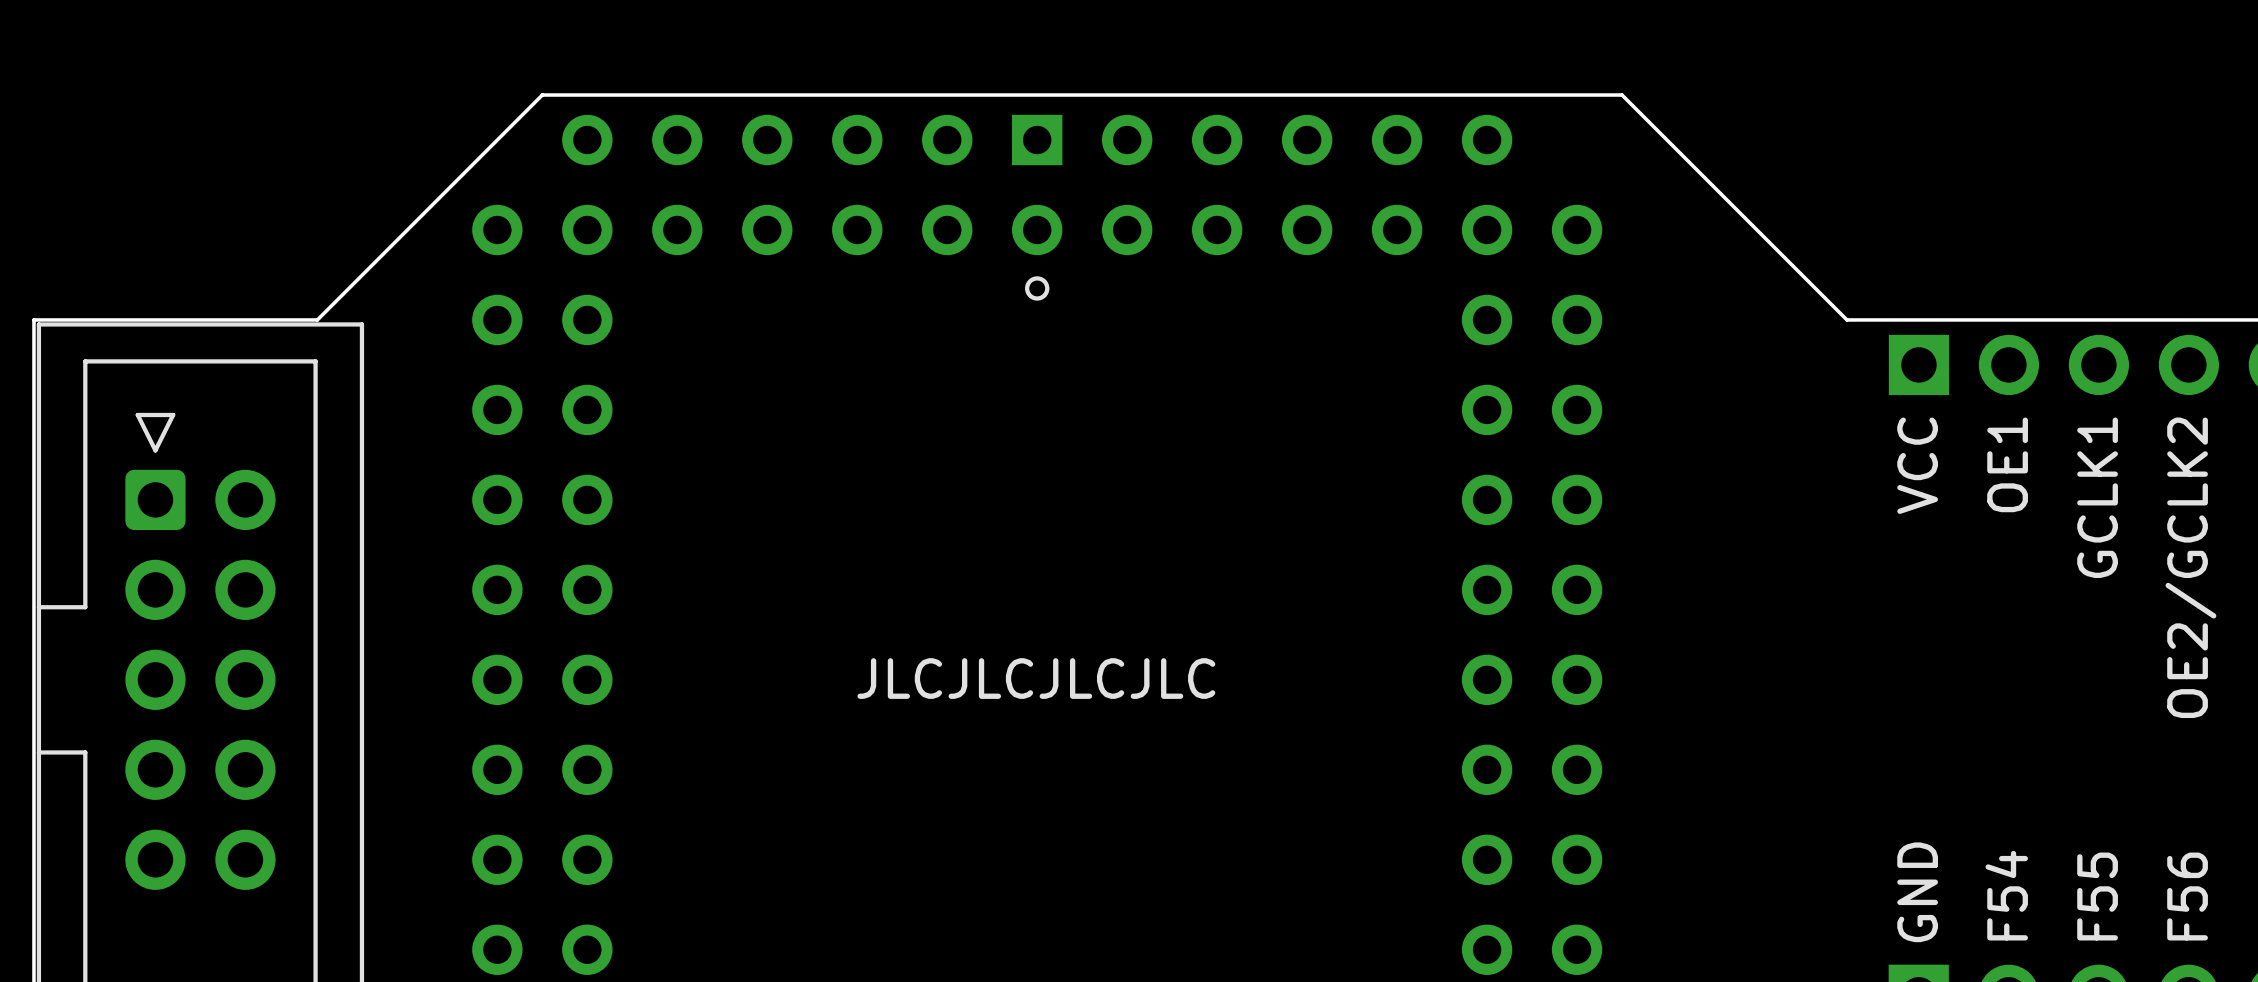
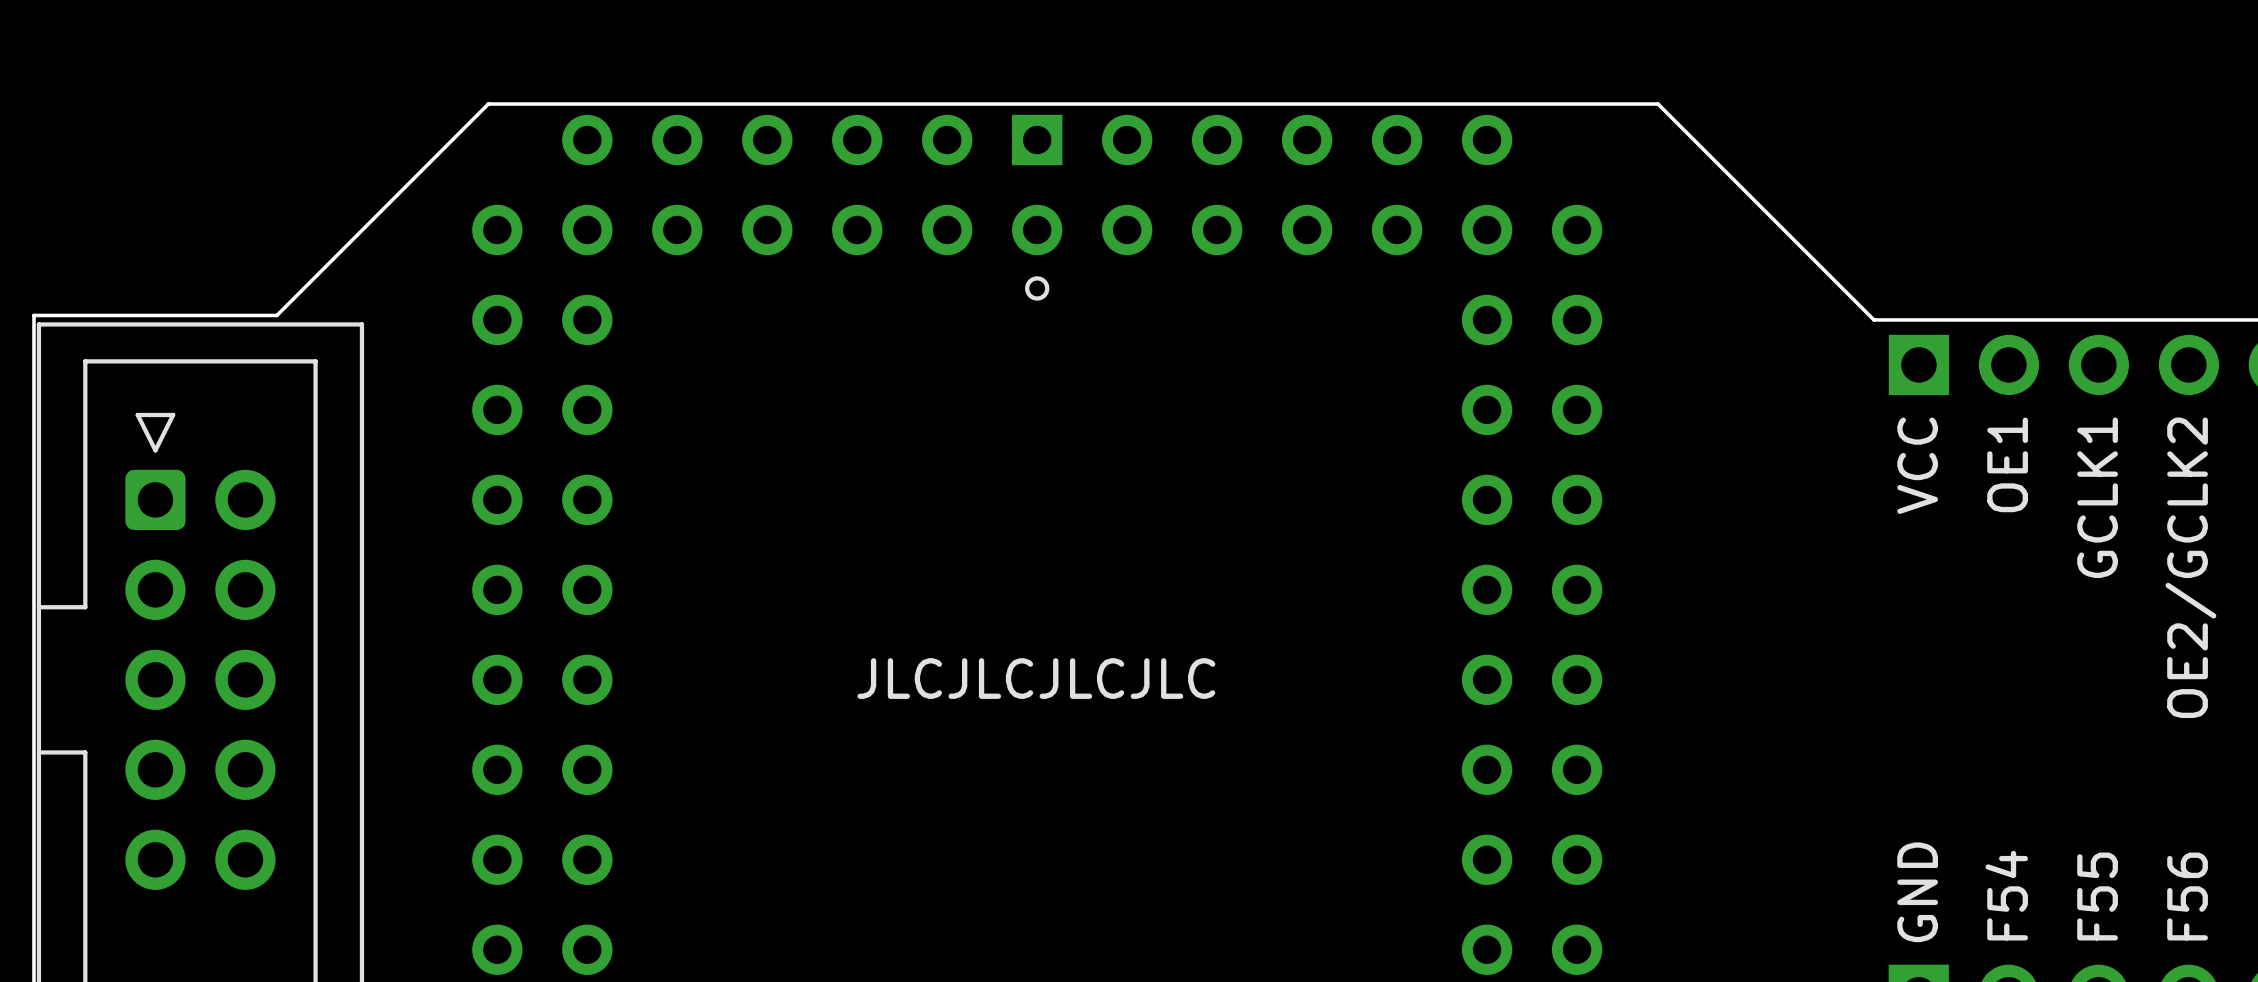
board edge: (33, 319) (317, 319) (542, 95) (1622, 95) (1846, 319) (1873, 319) -> (33, 319) (33, 315) (276, 315) (488, 104) (1658, 104) (1873, 319)

